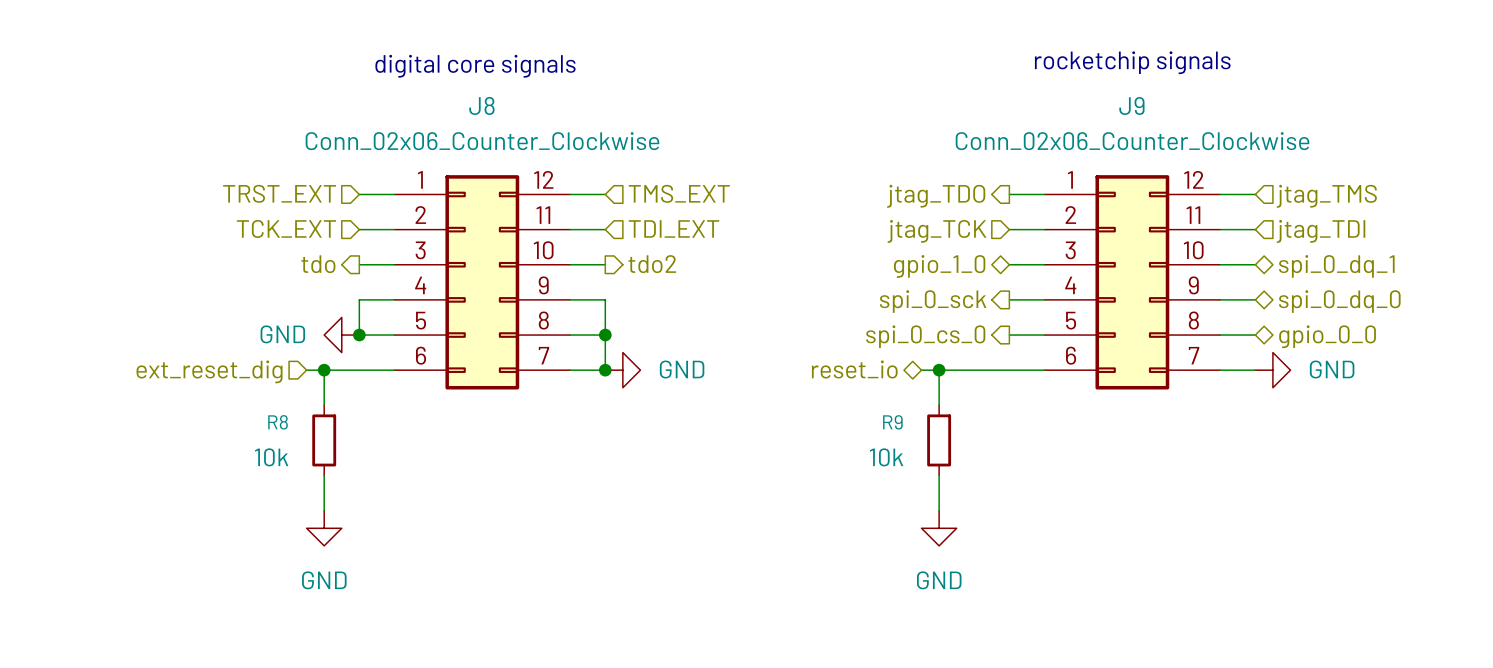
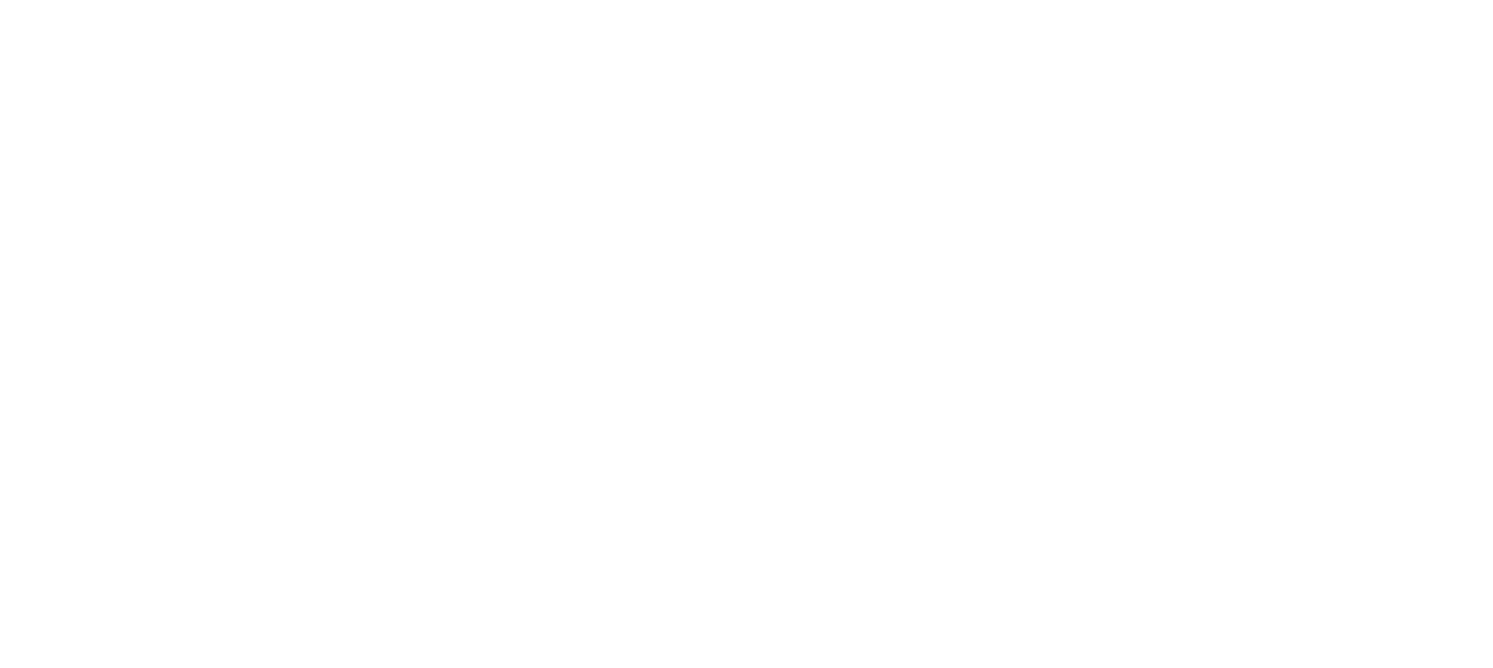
text: rocketchip signals (1132, 62) -> none
text: digital core signals (475, 66) -> none
hierarchical label: TRST_EXT (279, 193) -> none
hierarchical label: TMS_EXT (679, 193) -> none
wire: (359, 194) (394, 194) -> none
wire: (570, 194) (605, 194) -> none
wire: (1009, 194) (1044, 194) -> none
wire: (1220, 194) (1255, 194) -> none
hierarchical label: jtag_TDO (936, 196) -> none
hierarchical label: jtag_TMS (1326, 196) -> none
hierarchical label: TCK_EXT (286, 228) -> none
hierarchical label: TDI_EXT (673, 228) -> none
wire: (359, 229) (394, 229) -> none
wire: (570, 229) (605, 229) -> none
wire: (1009, 229) (1044, 229) -> none
wire: (1220, 229) (1255, 229) -> none
hierarchical label: jtag_TCK (937, 231) -> none
hierarchical label: jtag_TDI (1321, 231) -> none
hierarchical label: tdo (318, 264) -> none
wire: (359, 264) (394, 264) -> none
wire: (570, 264) (605, 264) -> none
hierarchical label: tdo2 (652, 264) -> none
wire: (1009, 264) (1044, 264) -> none
wire: (1220, 264) (1255, 264) -> none
hierarchical label: gpio_1_0 (939, 266) -> none
hierarchical label: spi_0_dq_1 (1336, 266) -> none
J8: Conn_02x06_Counter_Clockwise (482, 282) -> none
J9: Conn_02x06_Counter_Clockwise (1132, 282) -> none
wire: (394, 299) (359, 299) (359, 335) (394, 335) -> none
wire: (570, 299) (605, 299) (605, 370) (570, 370) -> none
wire: (1009, 299) (1044, 299) -> none
wire: (1220, 299) (1255, 299) -> none
hierarchical label: spi_0_sck (933, 301) -> none
hierarchical label: spi_0_dq_0 (1339, 301) -> none
power symbol: GND (341, 335) -> none
junction: (359, 335) -> none
wire: (570, 335) (605, 335) -> none
junction: (605, 335) -> none
wire: (1009, 335) (1044, 335) -> none
wire: (1220, 335) (1255, 335) -> none
hierarchical label: spi_0_cs_0 (925, 336) -> none
hierarchical label: gpio_0_0 (1327, 336) -> none
hierarchical label: reset_io (854, 369) -> none
wire: (306, 370) (394, 370) -> none
wire: (324, 370) (324, 405) -> none
junction: (324, 370) -> none
junction: (605, 370) -> none
power symbol: GND (622, 370) -> none
wire: (921, 370) (1044, 370) -> none
wire: (939, 370) (939, 405) -> none
junction: (939, 370) -> none
wire: (1220, 370) (1255, 370) -> none
power symbol: GND (1272, 370) -> none
hierarchical label: ext_reset_dig (209, 371) -> none
R8: 10k (324, 440) -> none
R9: 10k (939, 440) -> none
wire: (324, 475) (324, 510) -> none
wire: (939, 475) (939, 510) -> none
power symbol: GND (324, 528) -> none
power symbol: GND (939, 528) -> none

